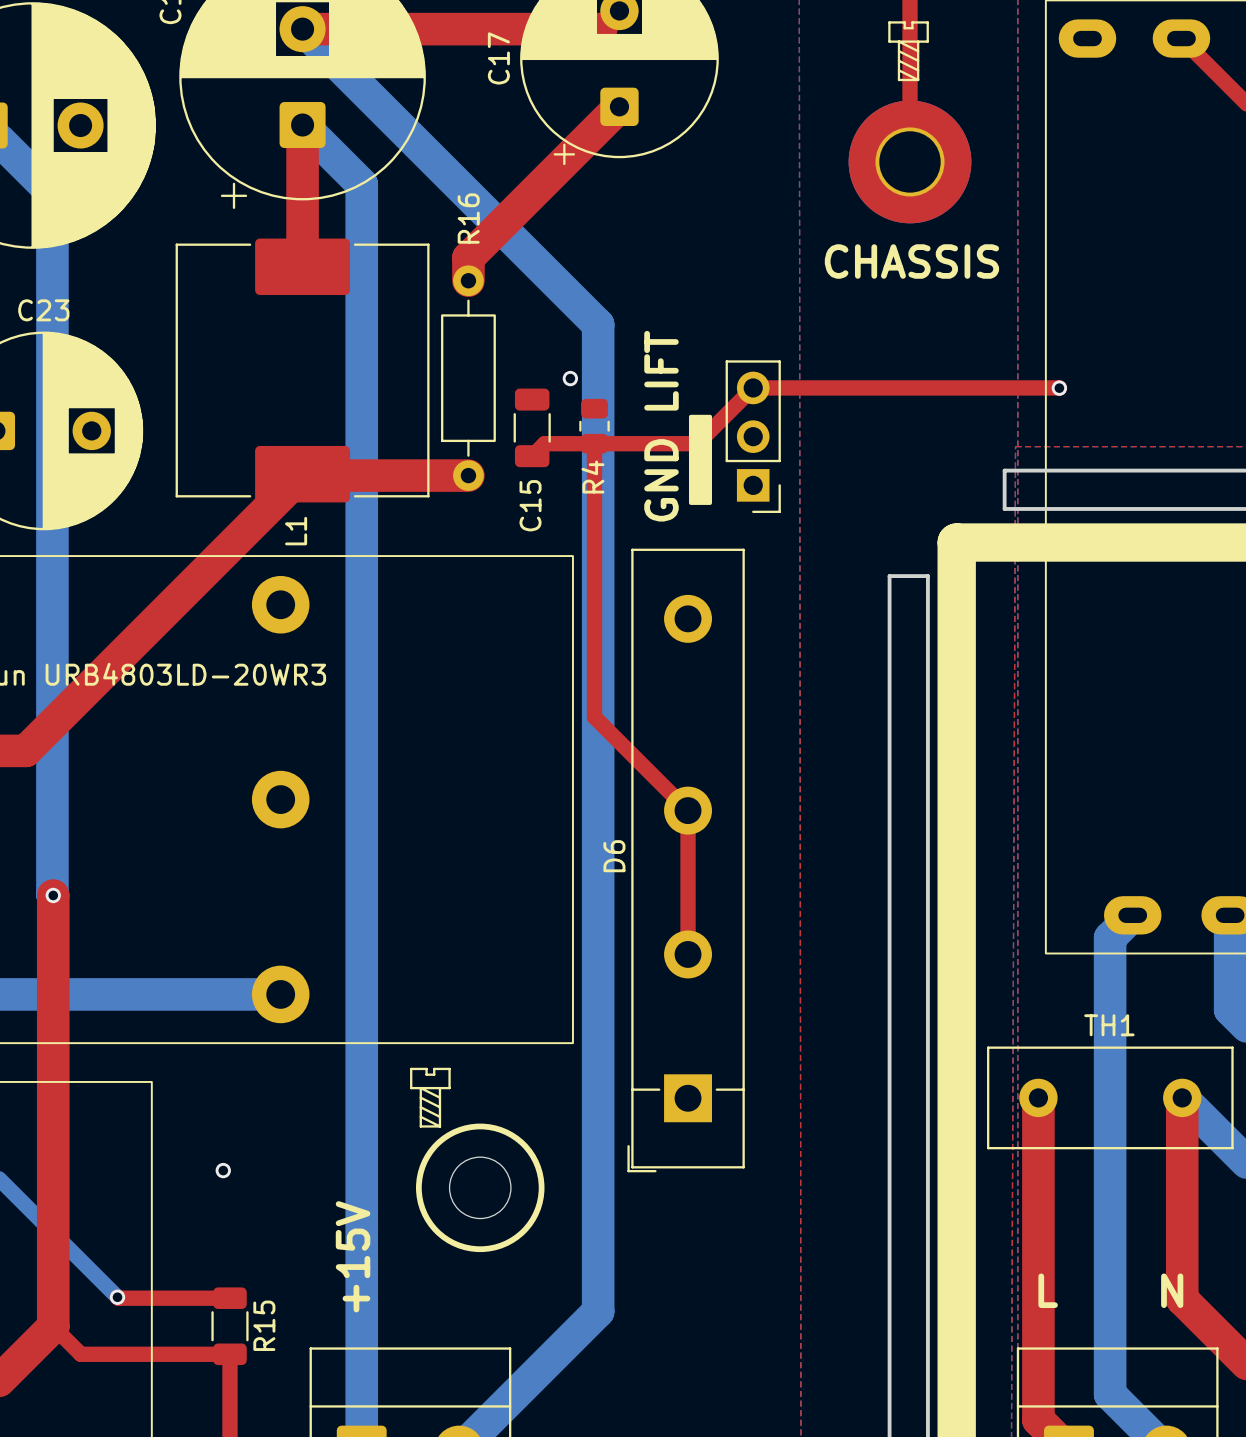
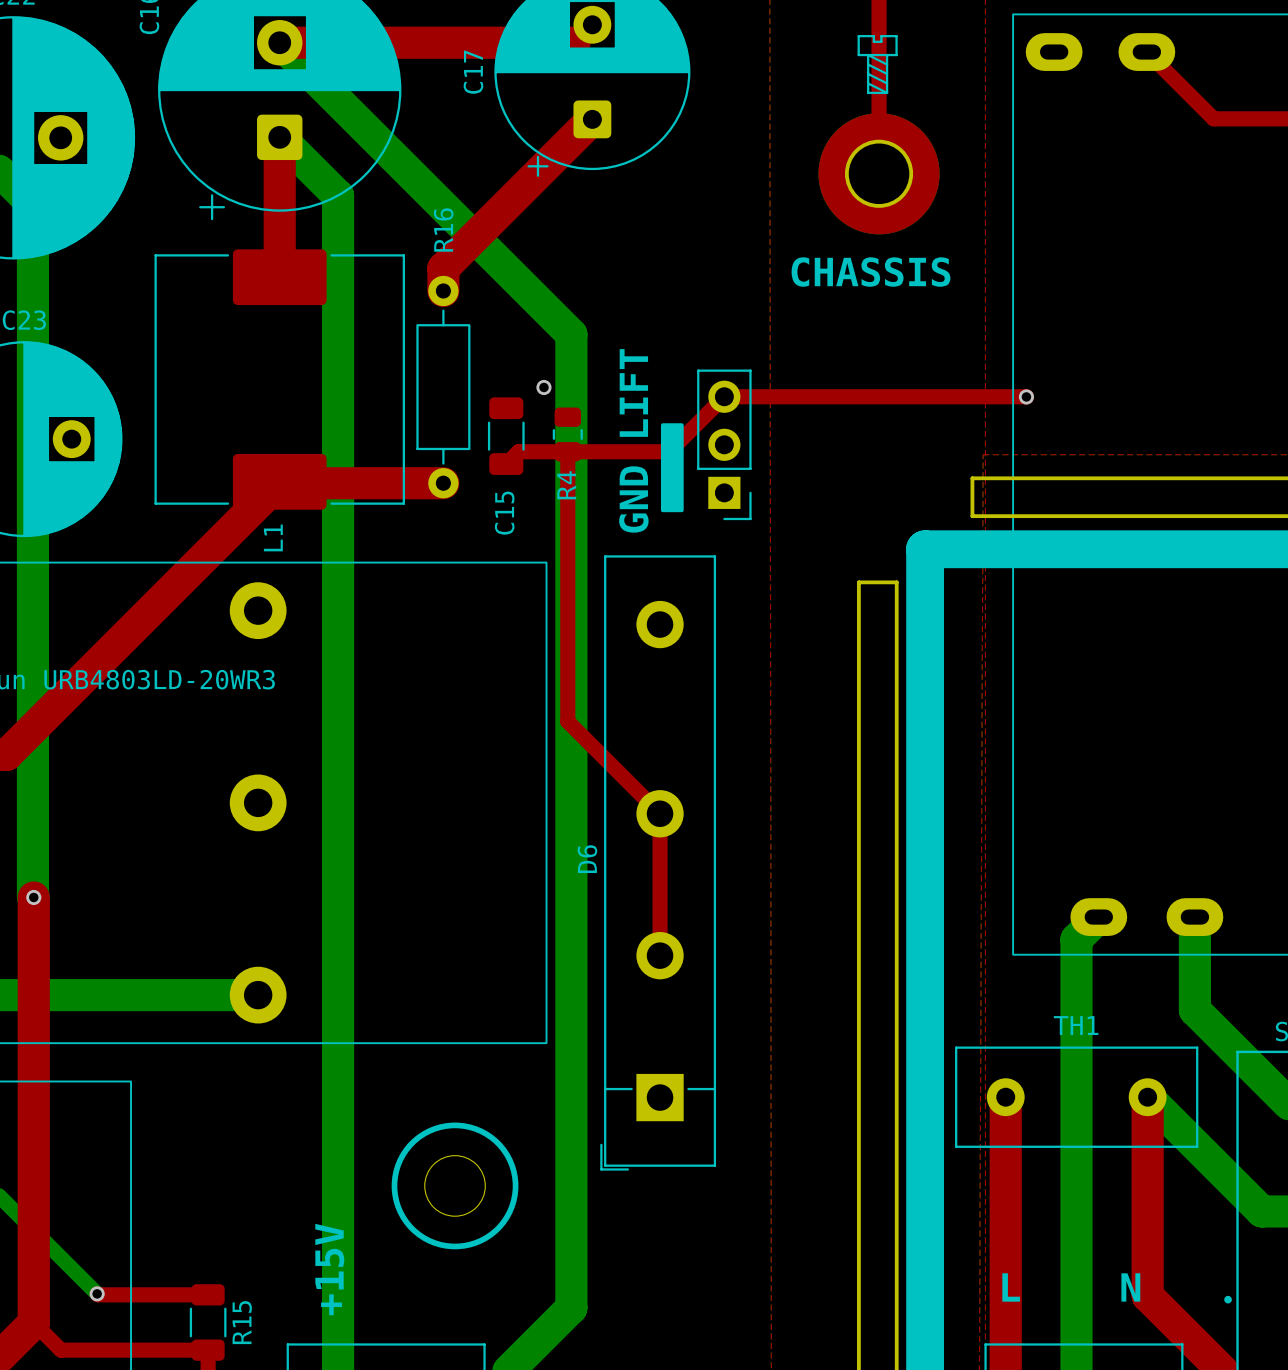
drawing: [410, 1067, 451, 1128] -> none
via: (223, 1170) -> none

